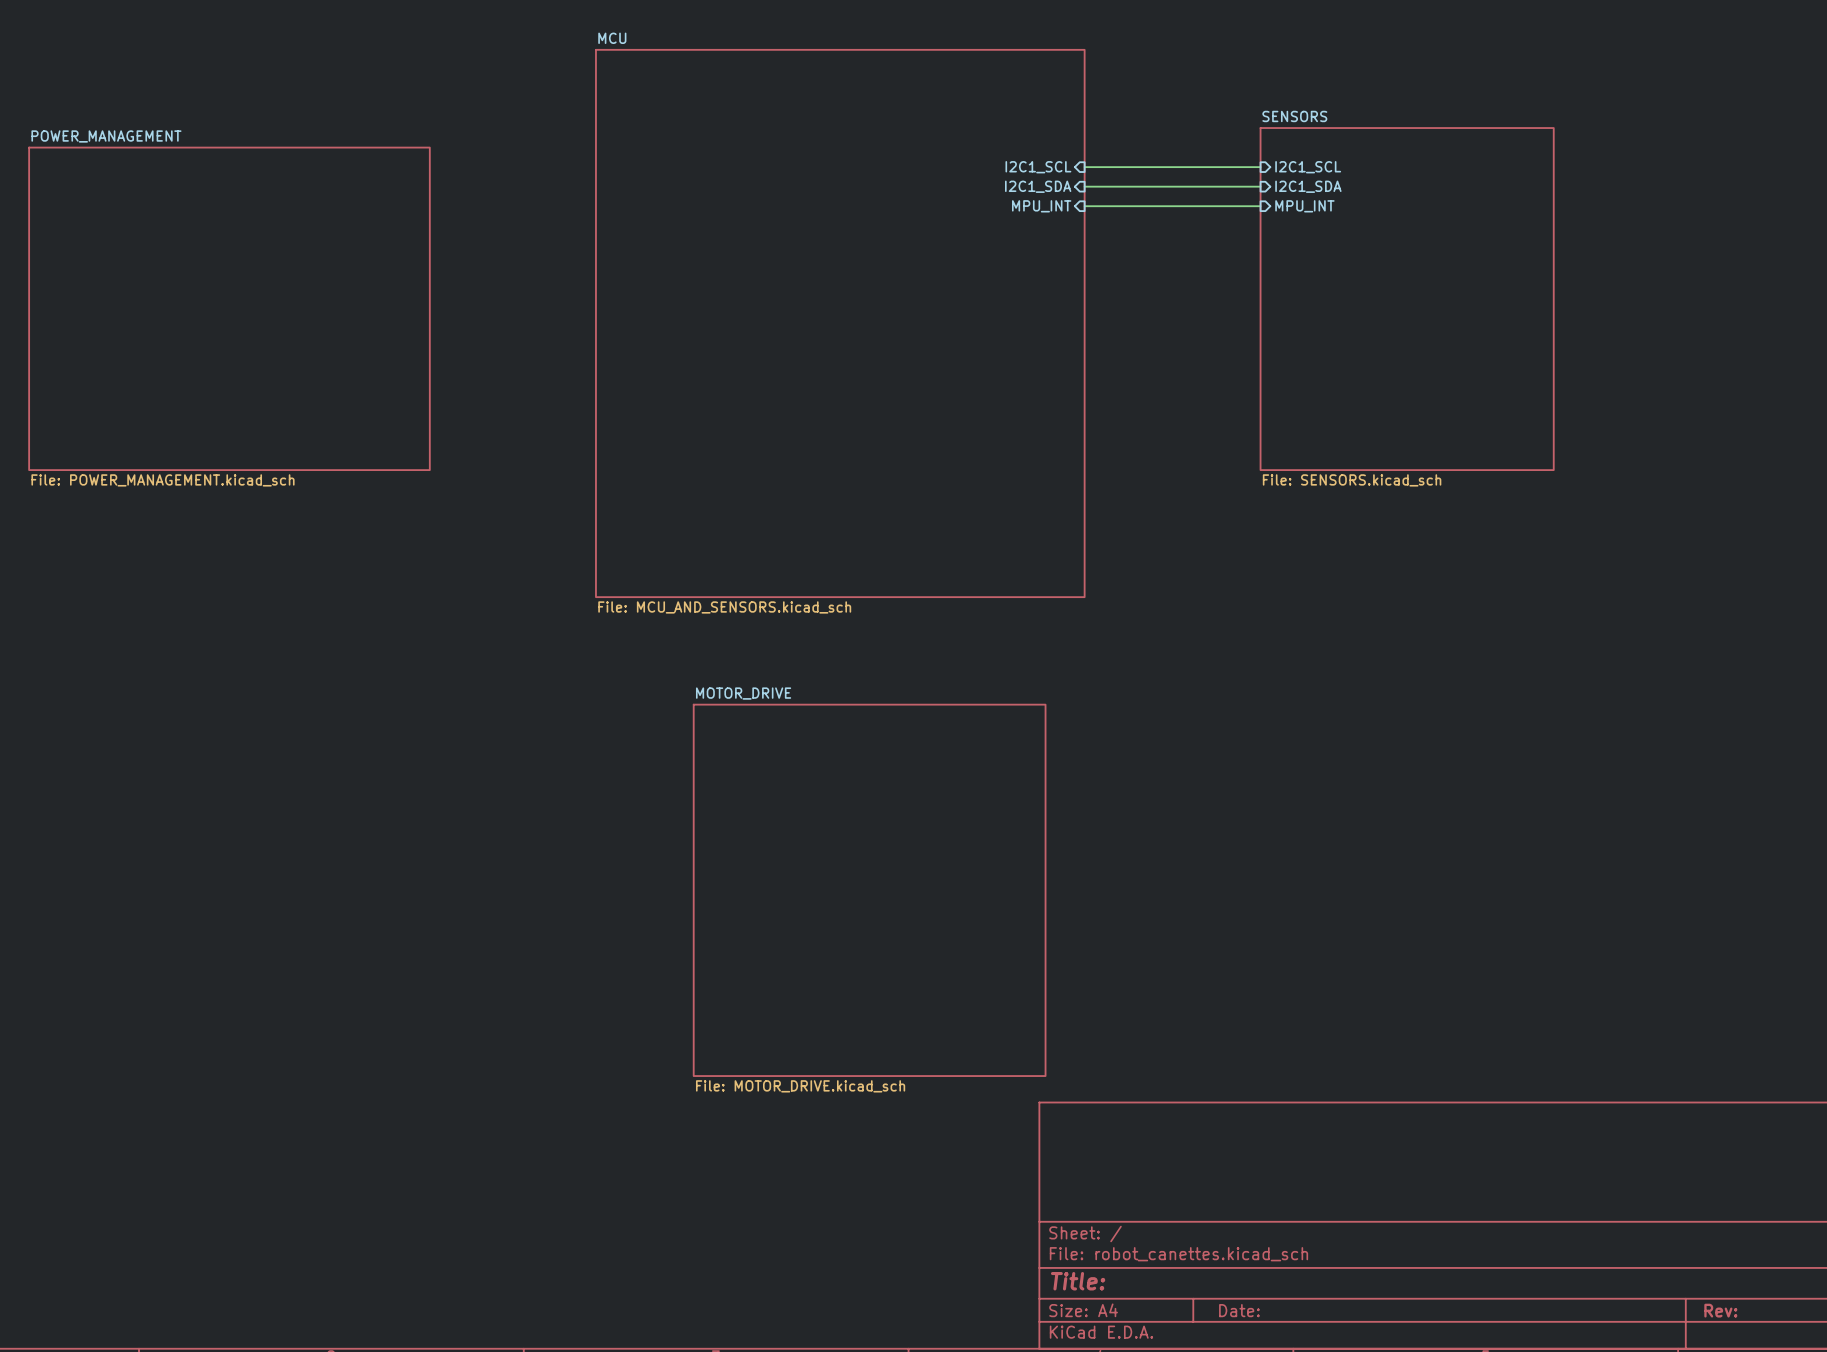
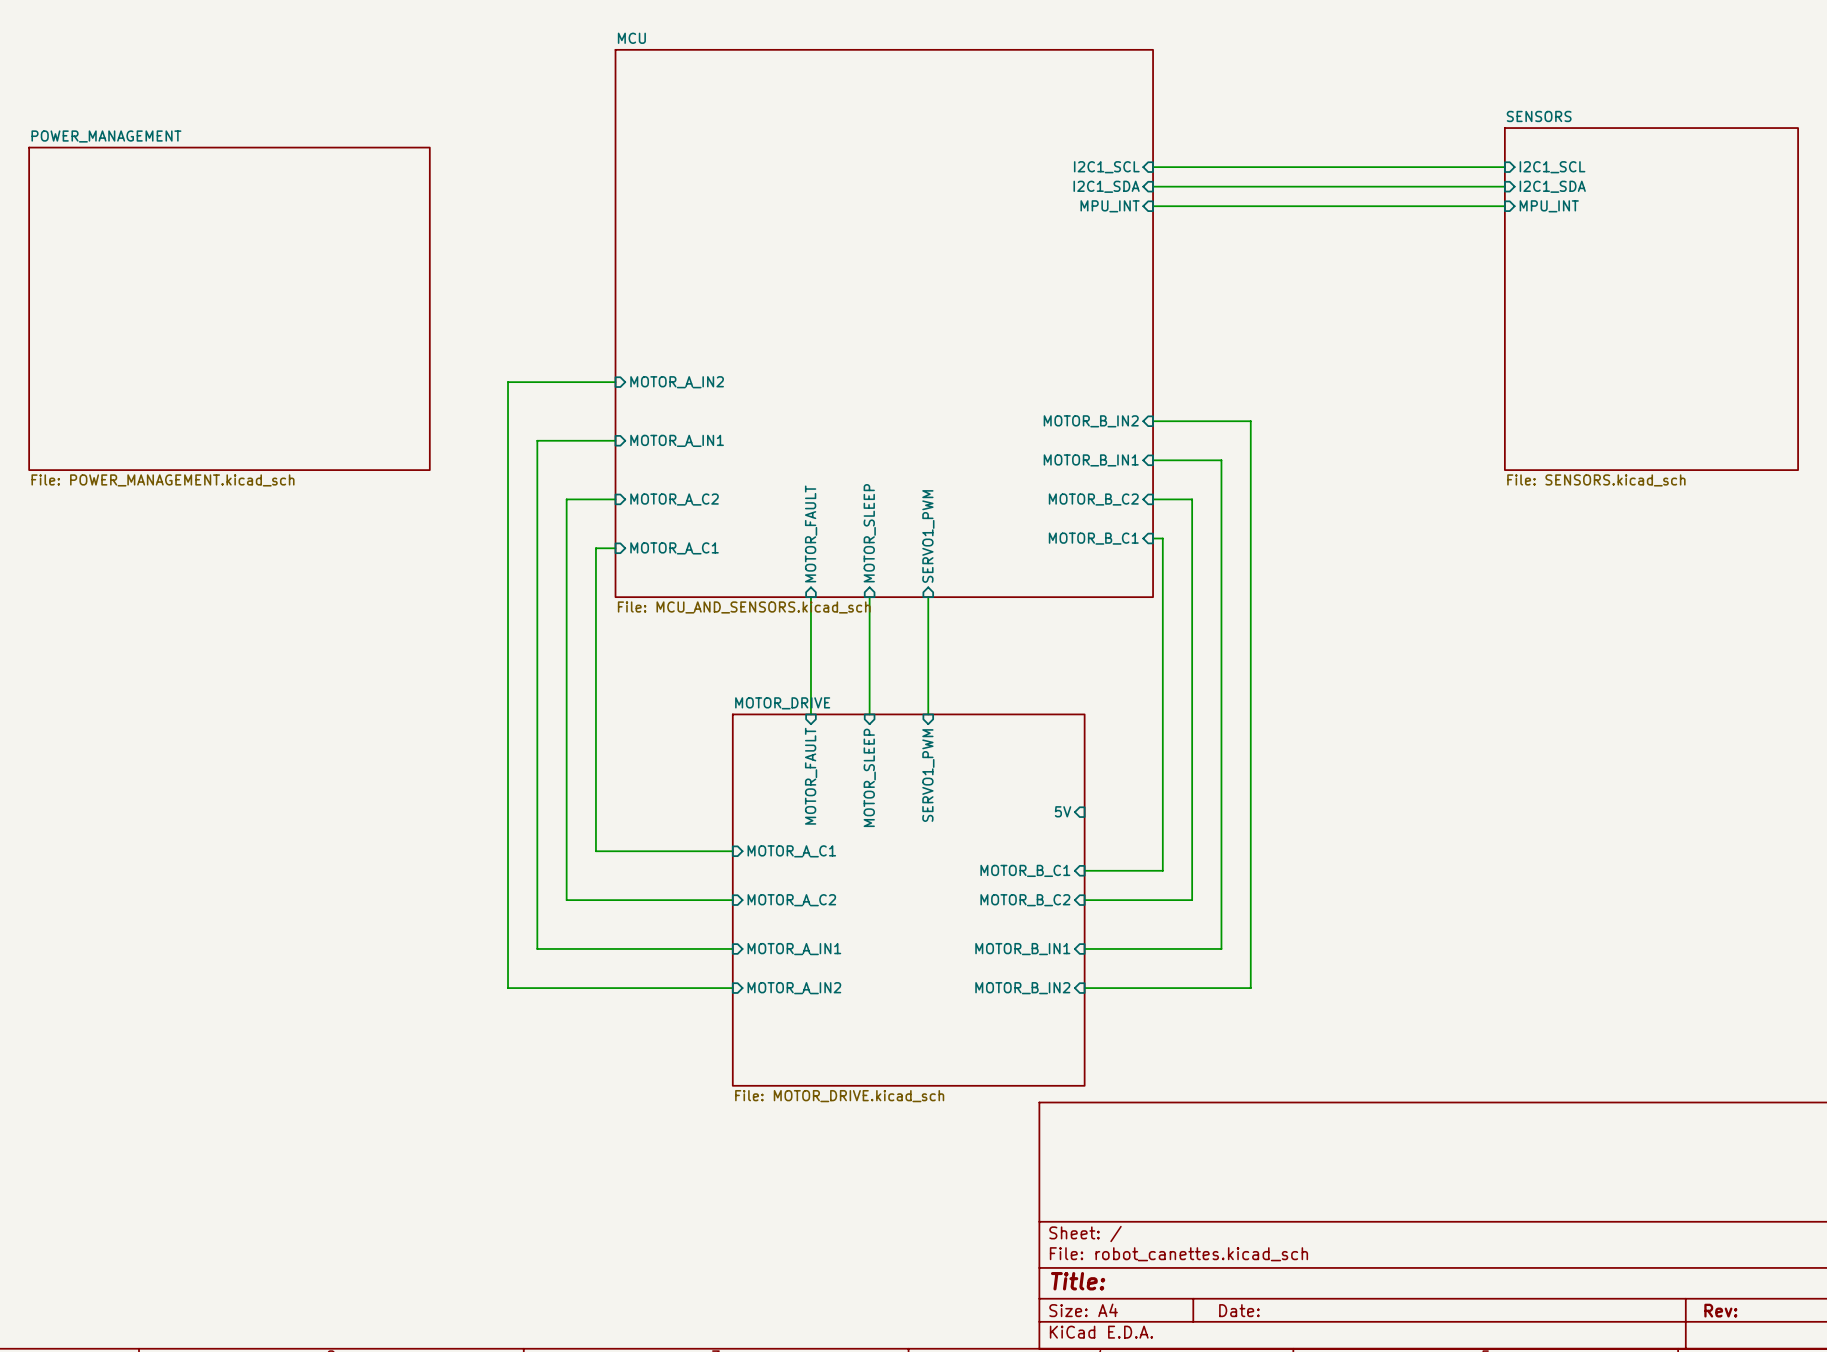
sheet pin: I2C1_SCL (1038, 167) -> none
wire: (1084, 167) (1153, 167) -> none
sheet pin: none -> I2C1_SCL (1106, 167)
wire: none -> (1260, 167) (1504, 167)
sheet pin: I2C1_SCL (1308, 167) -> none
sheet pin: none -> I2C1_SCL (1552, 167)
sheet pin: I2C1_SDA (1038, 186) -> none
wire: (1084, 186) (1153, 186) -> none
sheet pin: none -> I2C1_SDA (1106, 186)
wire: none -> (1260, 186) (1504, 186)
sheet pin: I2C1_SDA (1308, 186) -> none
sheet pin: none -> I2C1_SDA (1552, 186)
sheet pin position: MPU_INT (1041, 206) -> MPU_INT (1110, 206)
wire: (1084, 206) (1153, 206) -> none
wire: none -> (1260, 206) (1504, 206)
sheet pin: MPU_INT (1304, 206) -> none
sheet pin: none -> MPU_INT (1549, 206)
sheet SENSORS: File: SENSORS.kicad_sch (1407, 299) -> none
sheet SENSORS: none -> File: SENSORS.kicad_sch (1651, 299)
sheet MCU: File: MCU_AND_SENSORS.kicad_sch (840, 323) -> none
sheet MCU: none -> File: MCU_AND_SENSORS.kicad_sch (884, 323)
wire: none -> (615, 382) (508, 382) (508, 988) (732, 988)
sheet pin: none -> MOTOR_A_IN2 (677, 382)
sheet pin: none -> MOTOR_B_IN2 (1091, 421)
wire: none -> (1153, 421) (1250, 421) (1250, 988) (1084, 988)
wire: none -> (615, 440) (537, 440) (537, 948) (732, 948)
sheet pin: none -> MOTOR_A_IN1 (677, 440)
sheet pin: none -> MOTOR_B_IN1 (1091, 460)
wire: none -> (1153, 460) (1221, 460) (1221, 948) (1084, 948)
wire: none -> (615, 499) (566, 499) (566, 900) (732, 900)
sheet pin: none -> MOTOR_A_C2 (674, 499)
sheet pin: none -> MOTOR_B_C2 (1093, 499)
wire: none -> (1153, 499) (1192, 499) (1192, 900) (1084, 900)
sheet pin: none -> MOTOR_FAULT (811, 533)
sheet pin: none -> MOTOR_SLEEP (869, 533)
sheet pin: none -> SERVO1_PWM (928, 536)
sheet pin: none -> MOTOR_B_C1 (1093, 538)
wire: none -> (1153, 538) (1162, 538) (1162, 870) (1084, 870)
wire: none -> (615, 548) (595, 548) (595, 851) (732, 851)
sheet pin: none -> MOTOR_A_C1 (674, 548)
wire: none -> (810, 597) (810, 714)
wire: none -> (869, 597) (869, 714)
wire: none -> (928, 597) (928, 714)
sheet pin: none -> SERVO1_PWM (928, 775)
sheet pin: none -> MOTOR_FAULT (811, 776)
sheet pin: none -> MOTOR_SLEEP (869, 777)
sheet pin: none -> 5V (1063, 811)
sheet pin: none -> MOTOR_A_C1 (791, 851)
sheet pin: none -> MOTOR_B_C1 (1025, 870)
sheet MOTOR_DRIVE position: (869, 890) -> (908, 900)
sheet pin: none -> MOTOR_A_C2 (791, 900)
sheet pin: none -> MOTOR_B_C2 (1025, 900)
sheet pin: none -> MOTOR_A_IN1 (794, 949)
sheet pin: none -> MOTOR_B_IN1 (1022, 949)
sheet pin: none -> MOTOR_A_IN2 (794, 988)
sheet pin: none -> MOTOR_B_IN2 (1022, 988)

